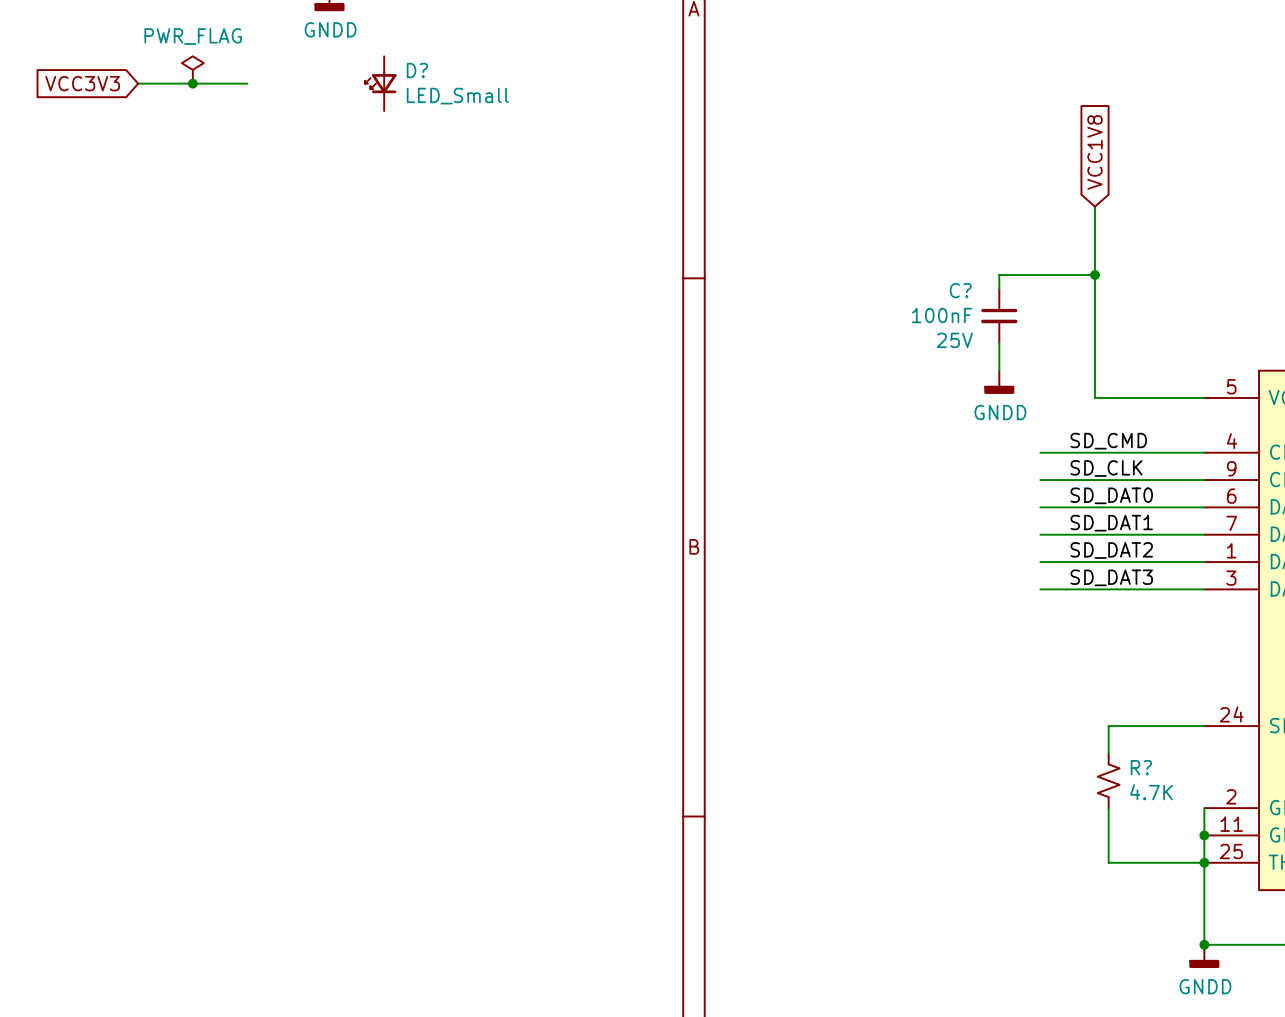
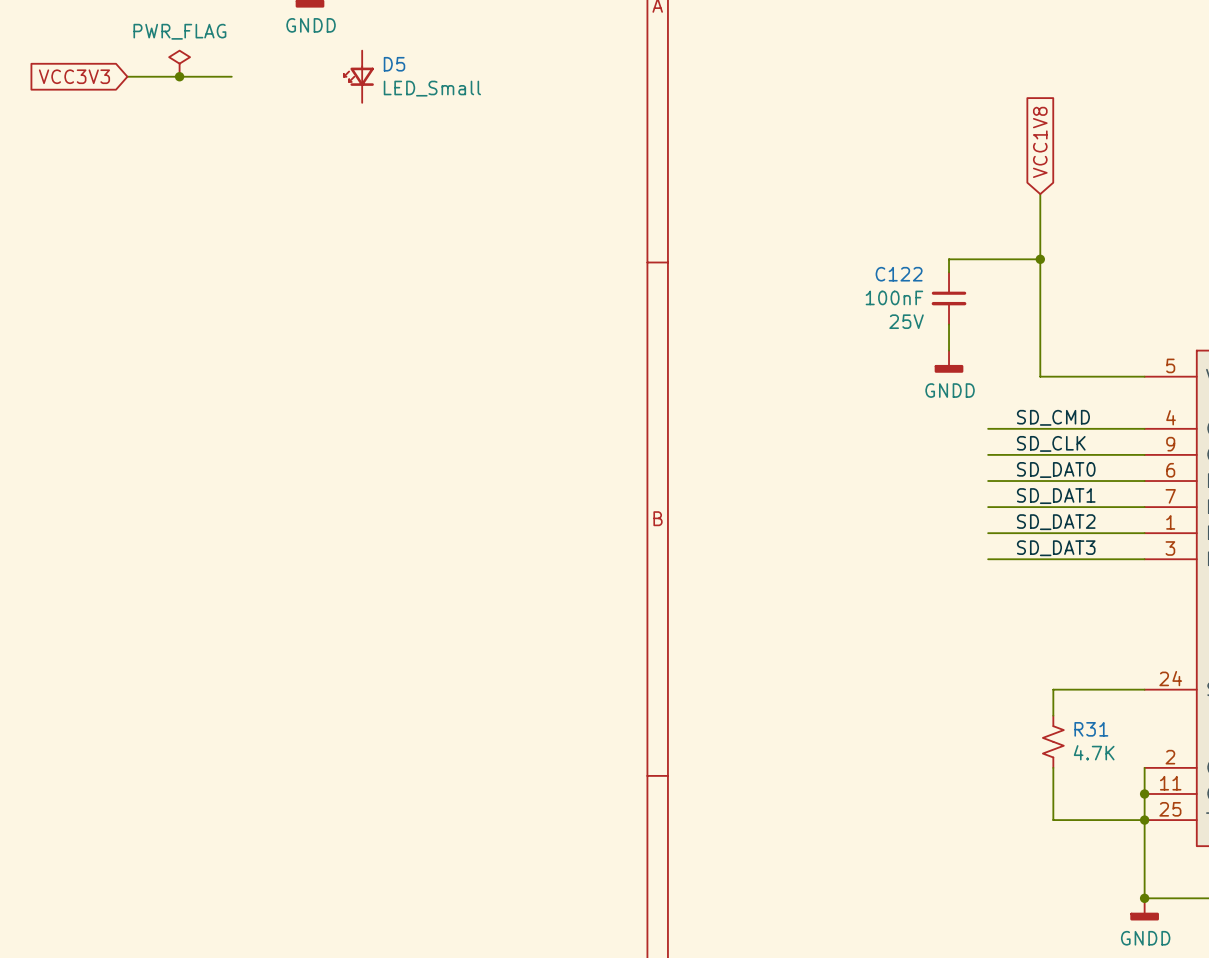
D? name: D? (417, 70) -> D5 (394, 64)
C? name: C? (960, 290) -> C122 (899, 274)
R? name: R? (1141, 767) -> R31 (1091, 729)

